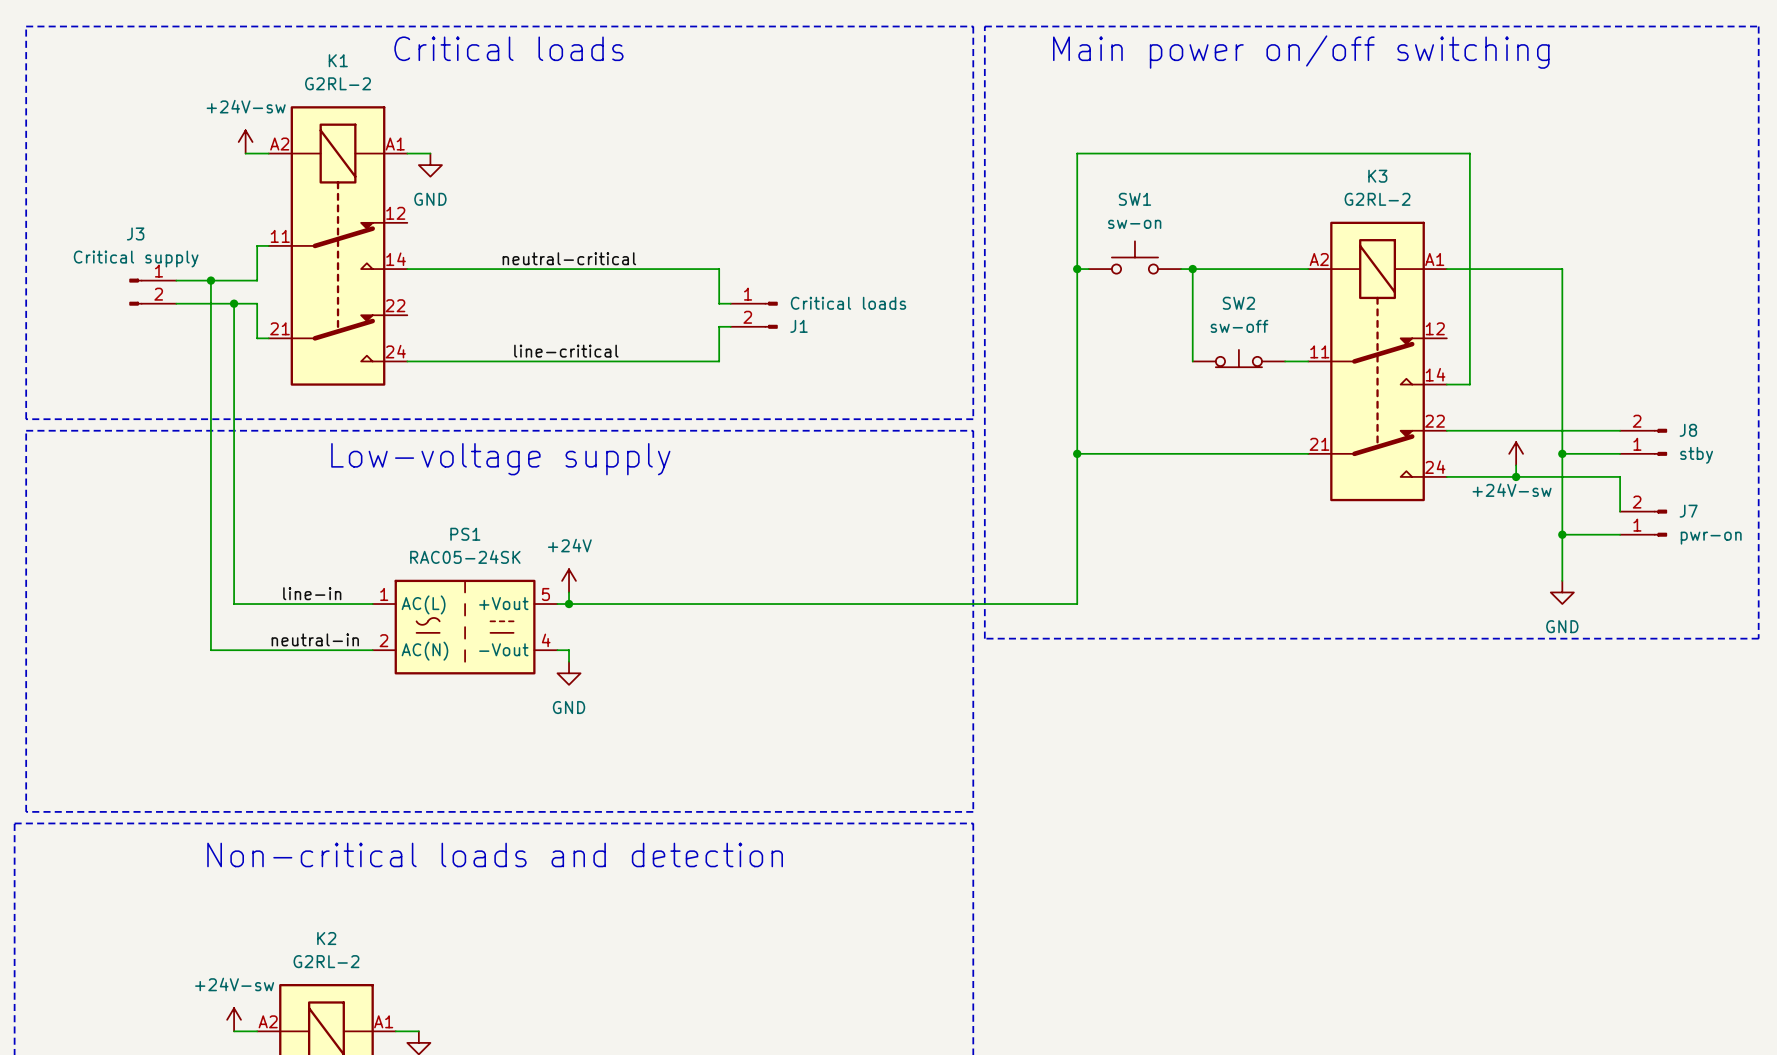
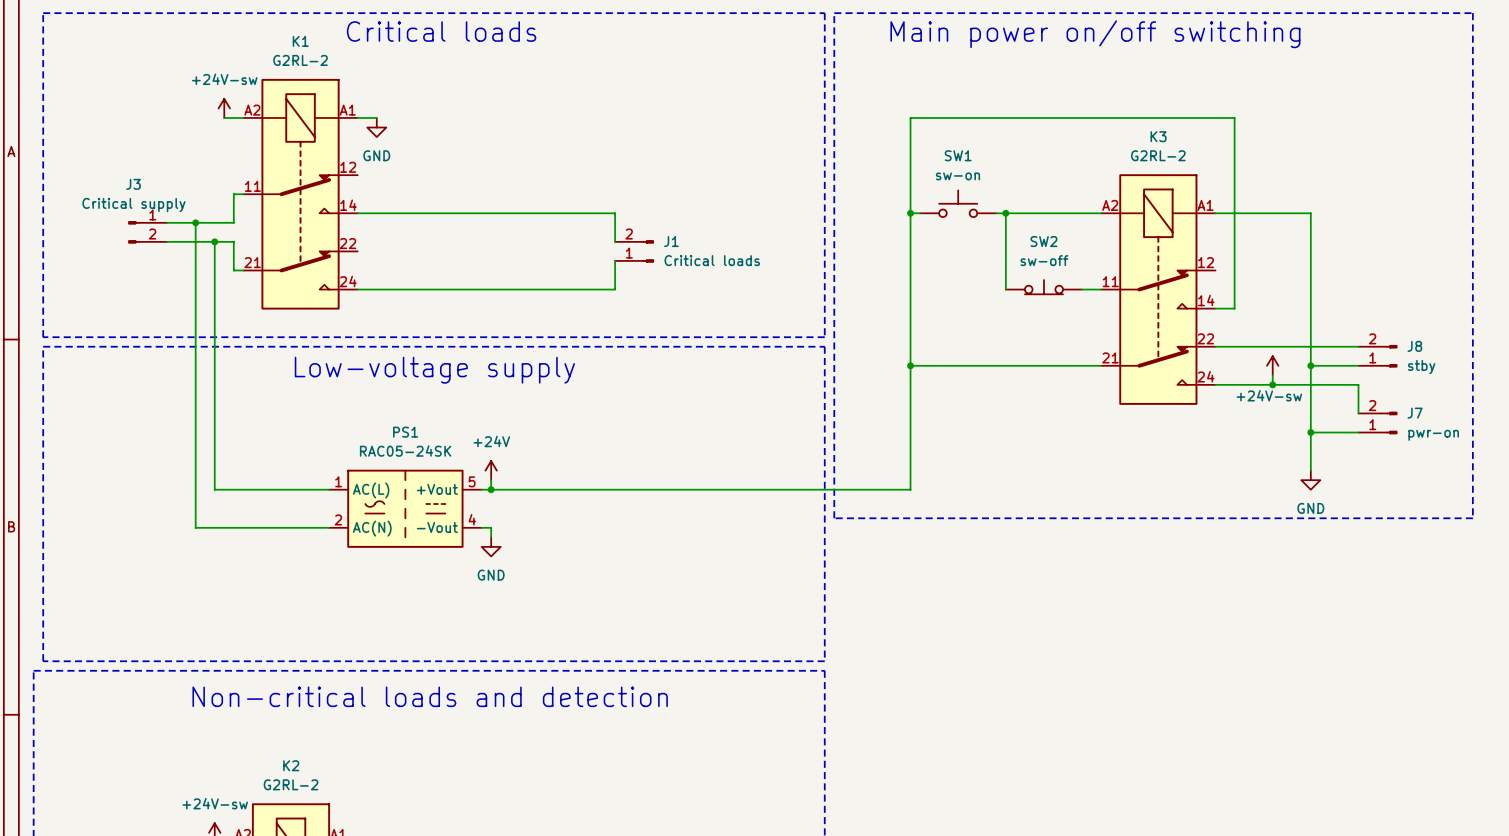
label: neutral-critical (569, 258) -> none
J1 flip: as is (771, 315) -> up-down (648, 251)
label: line-critical (566, 351) -> none
label: line-in (312, 593) -> none
label: neutral-in (315, 639) -> none

